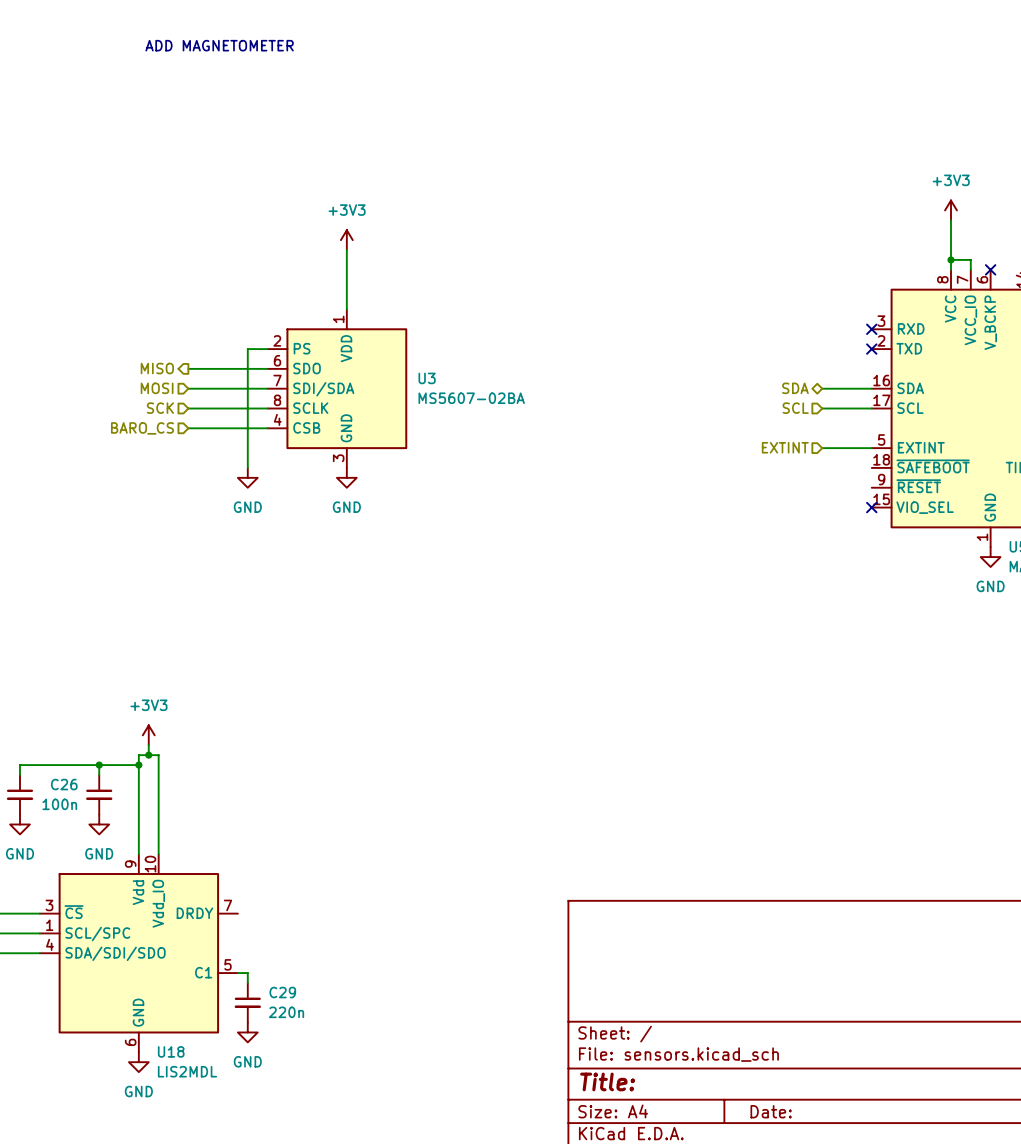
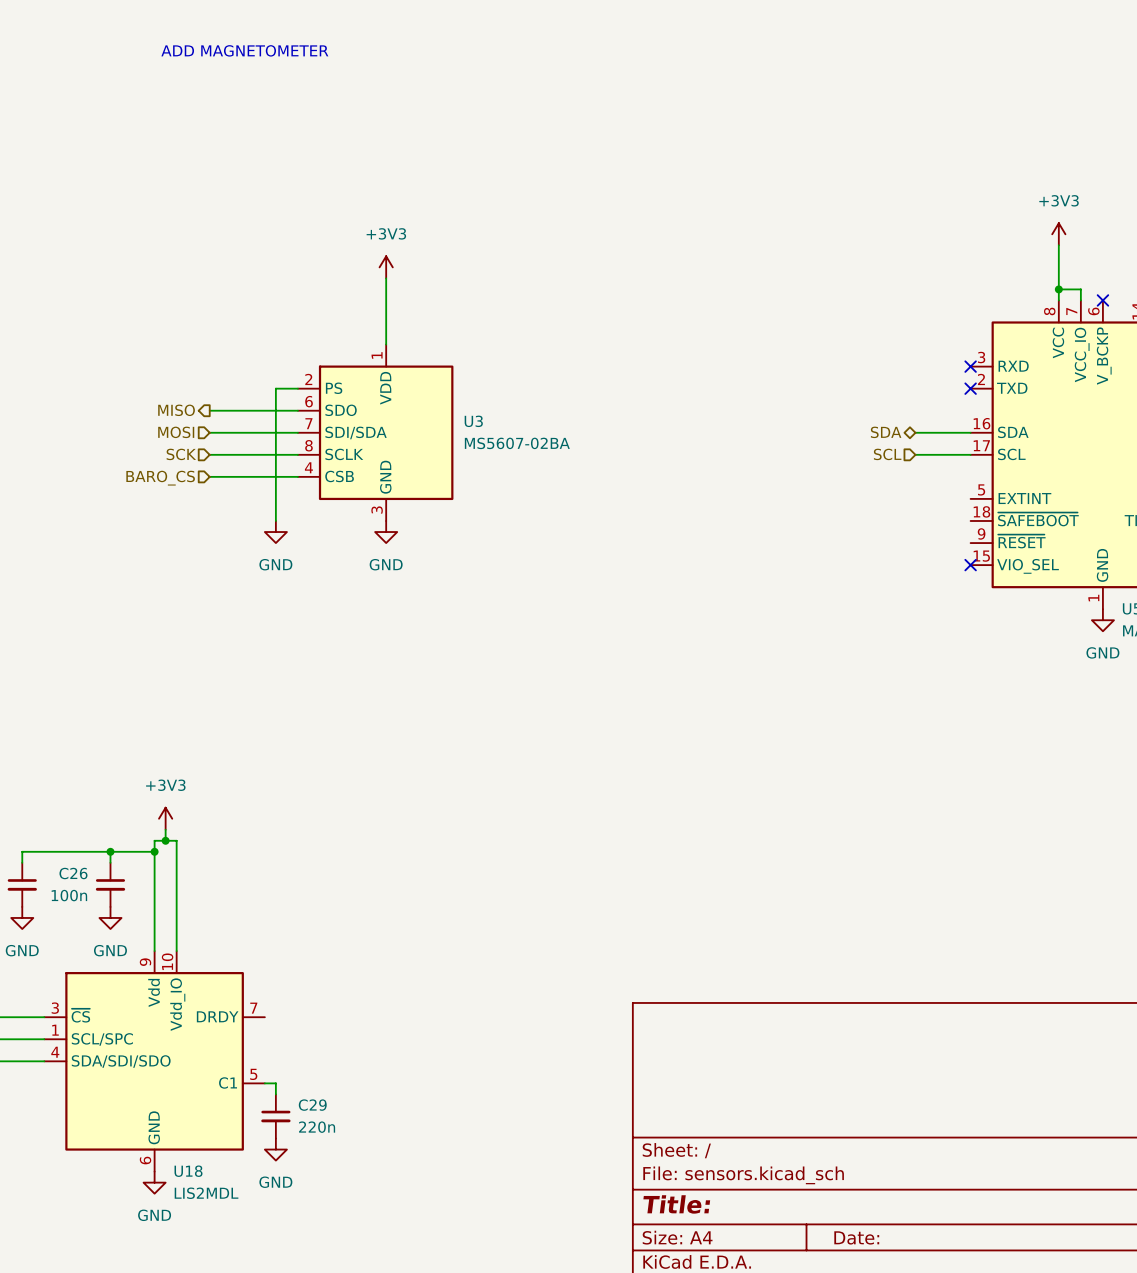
hierarchical label: EXTINT (785, 447) -> none
wire: (822, 448) (871, 448) -> none

